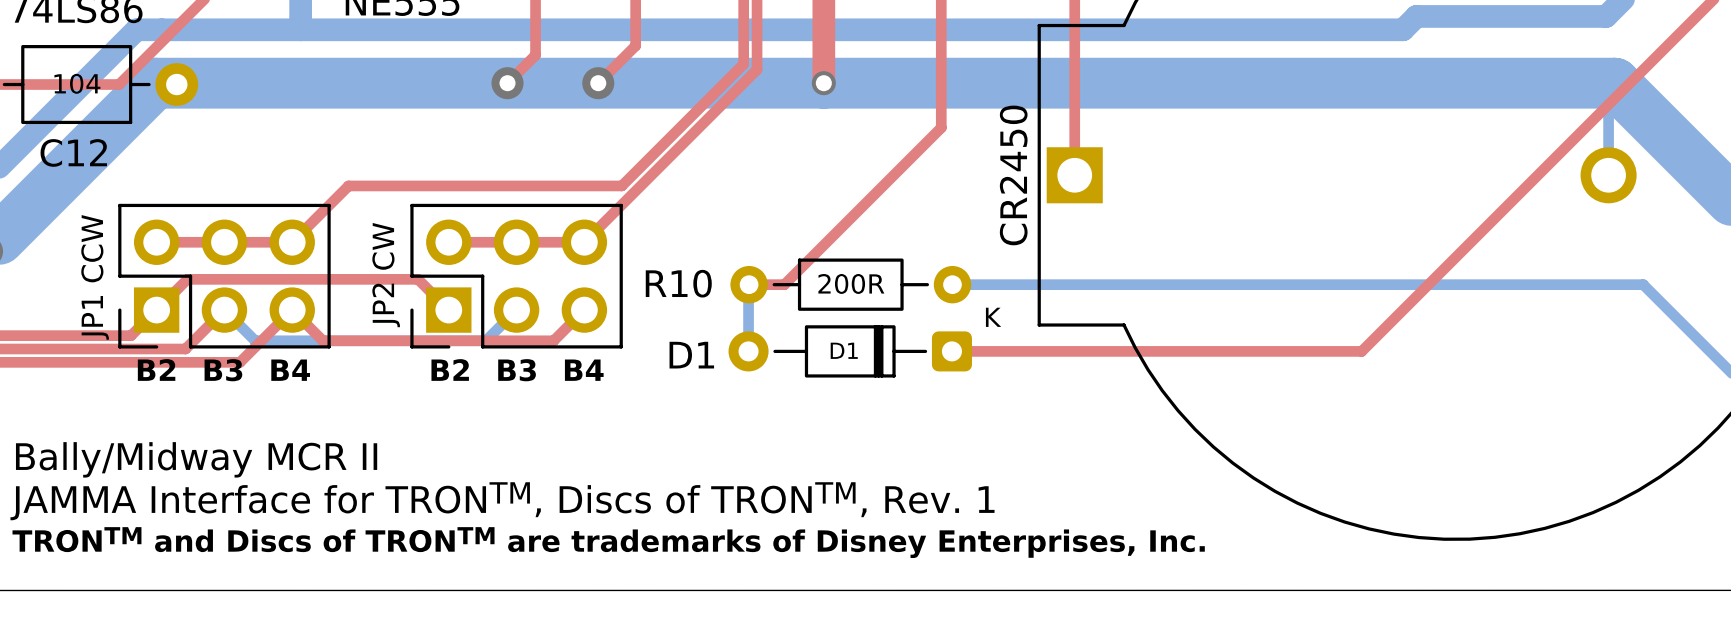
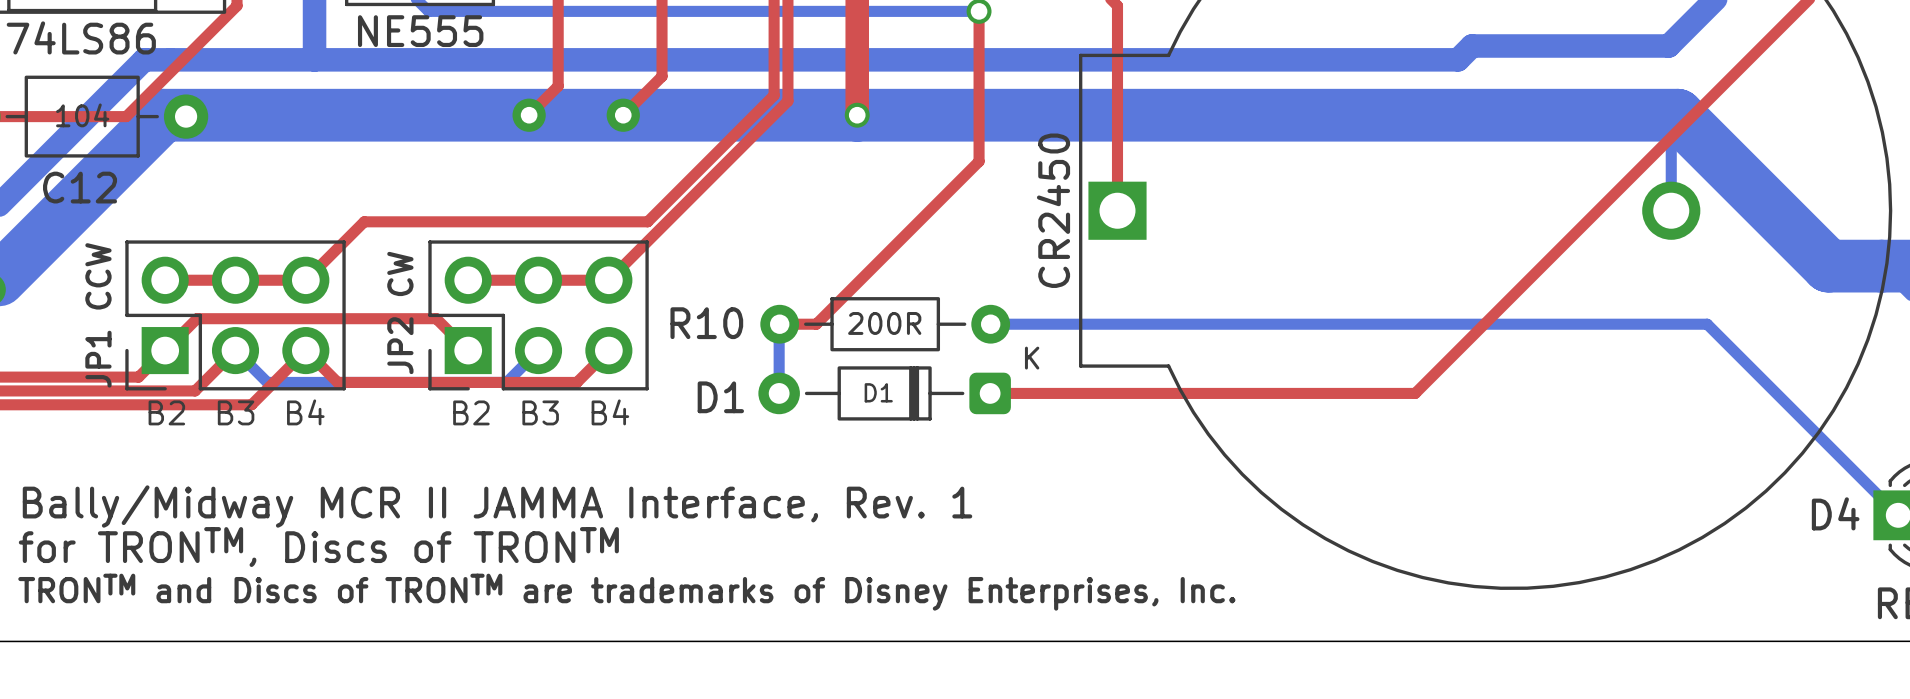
text: Bally/Midway MCR II (196, 459) -> Bally/Midway MCR II JAMMA Interface, Rev. 1 (497, 506)
text: JAMMA Interface for TRONTM, Discs of TRONTM, Rev. 1 (502, 501) -> for TRONTM, Discs of TRONTM (318, 547)

